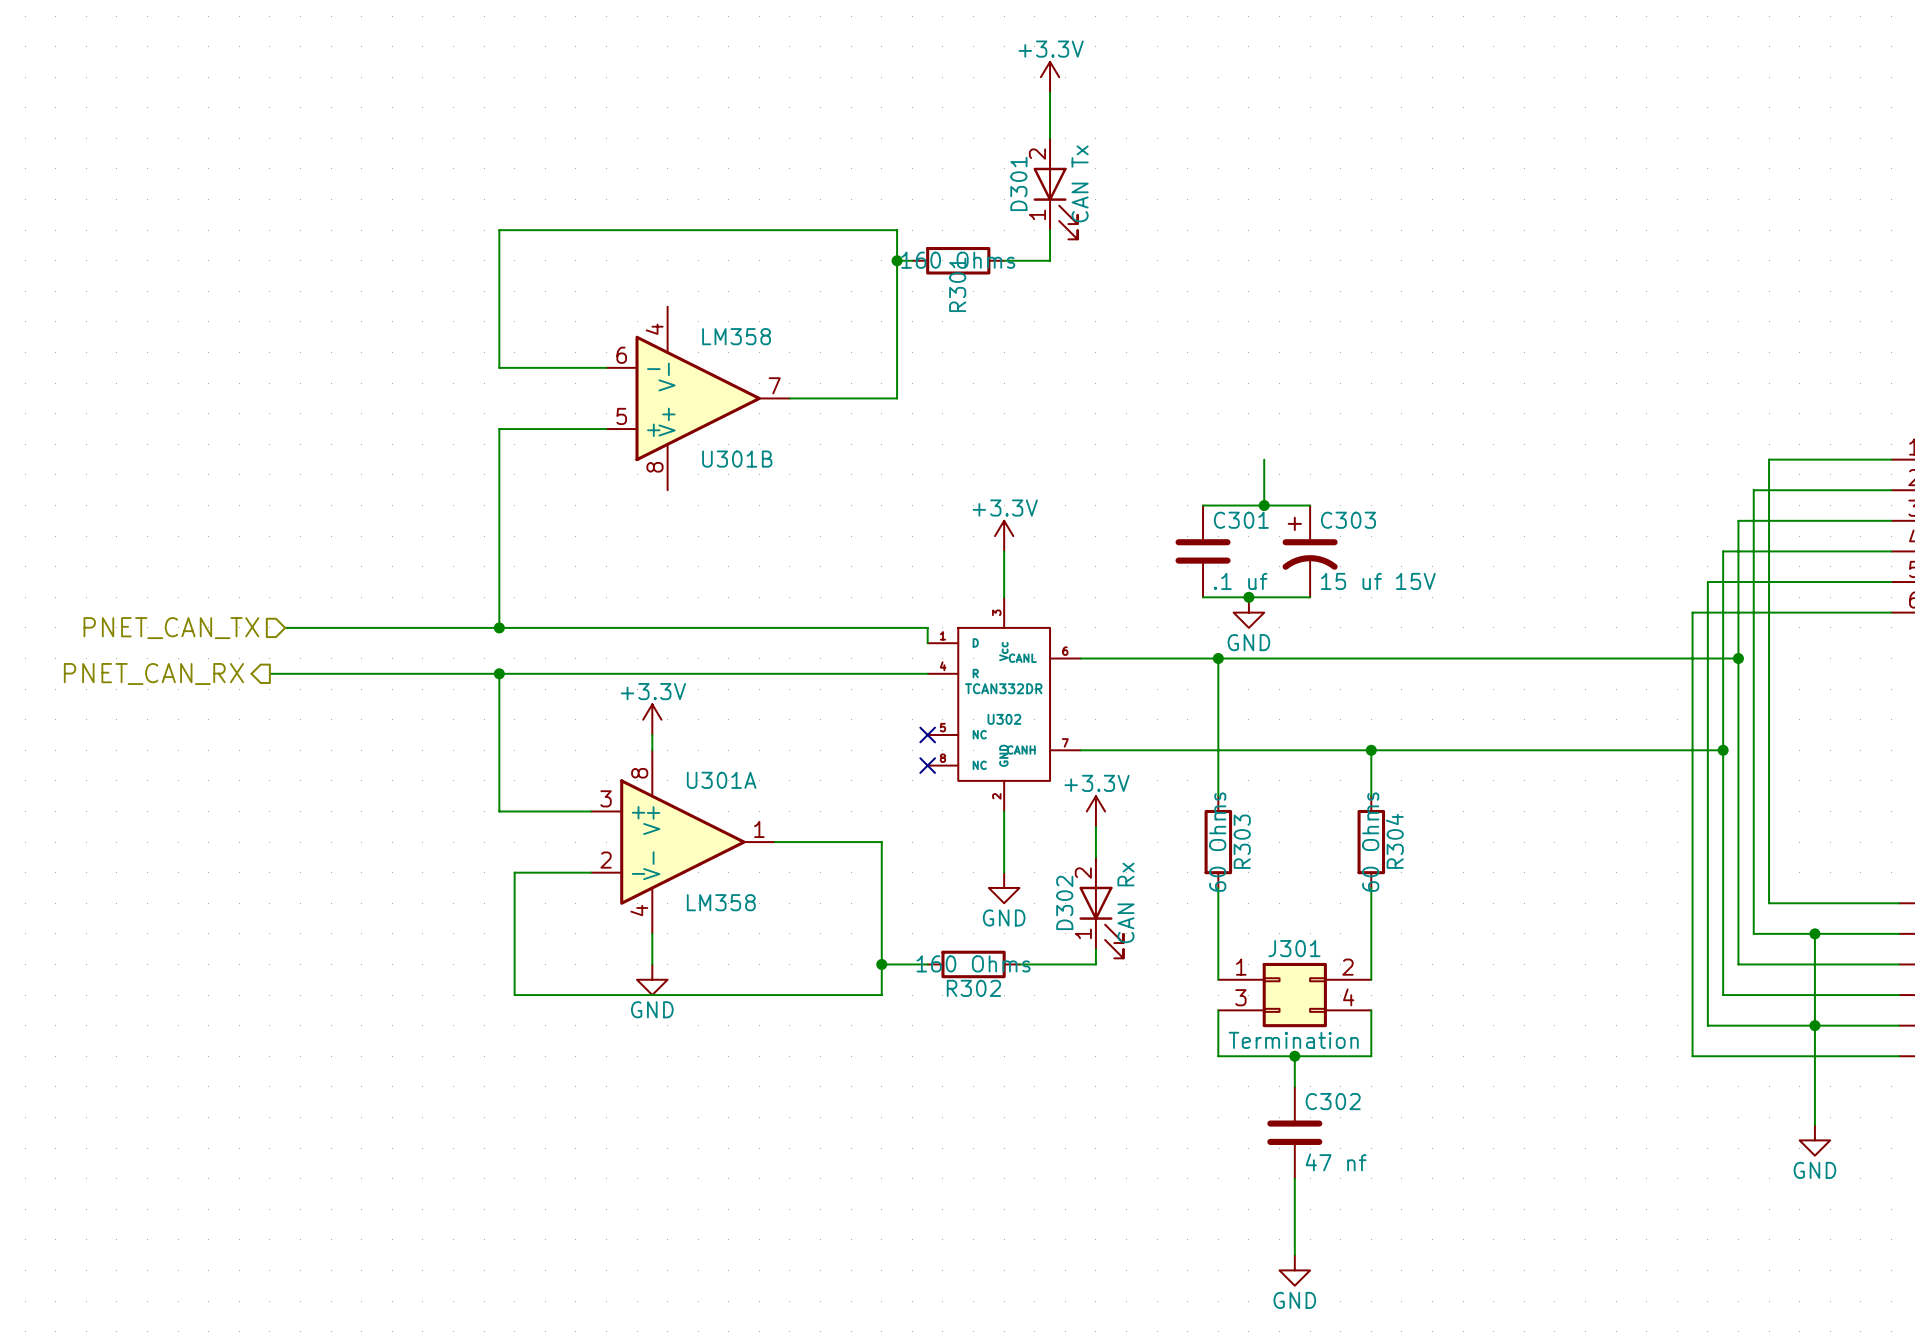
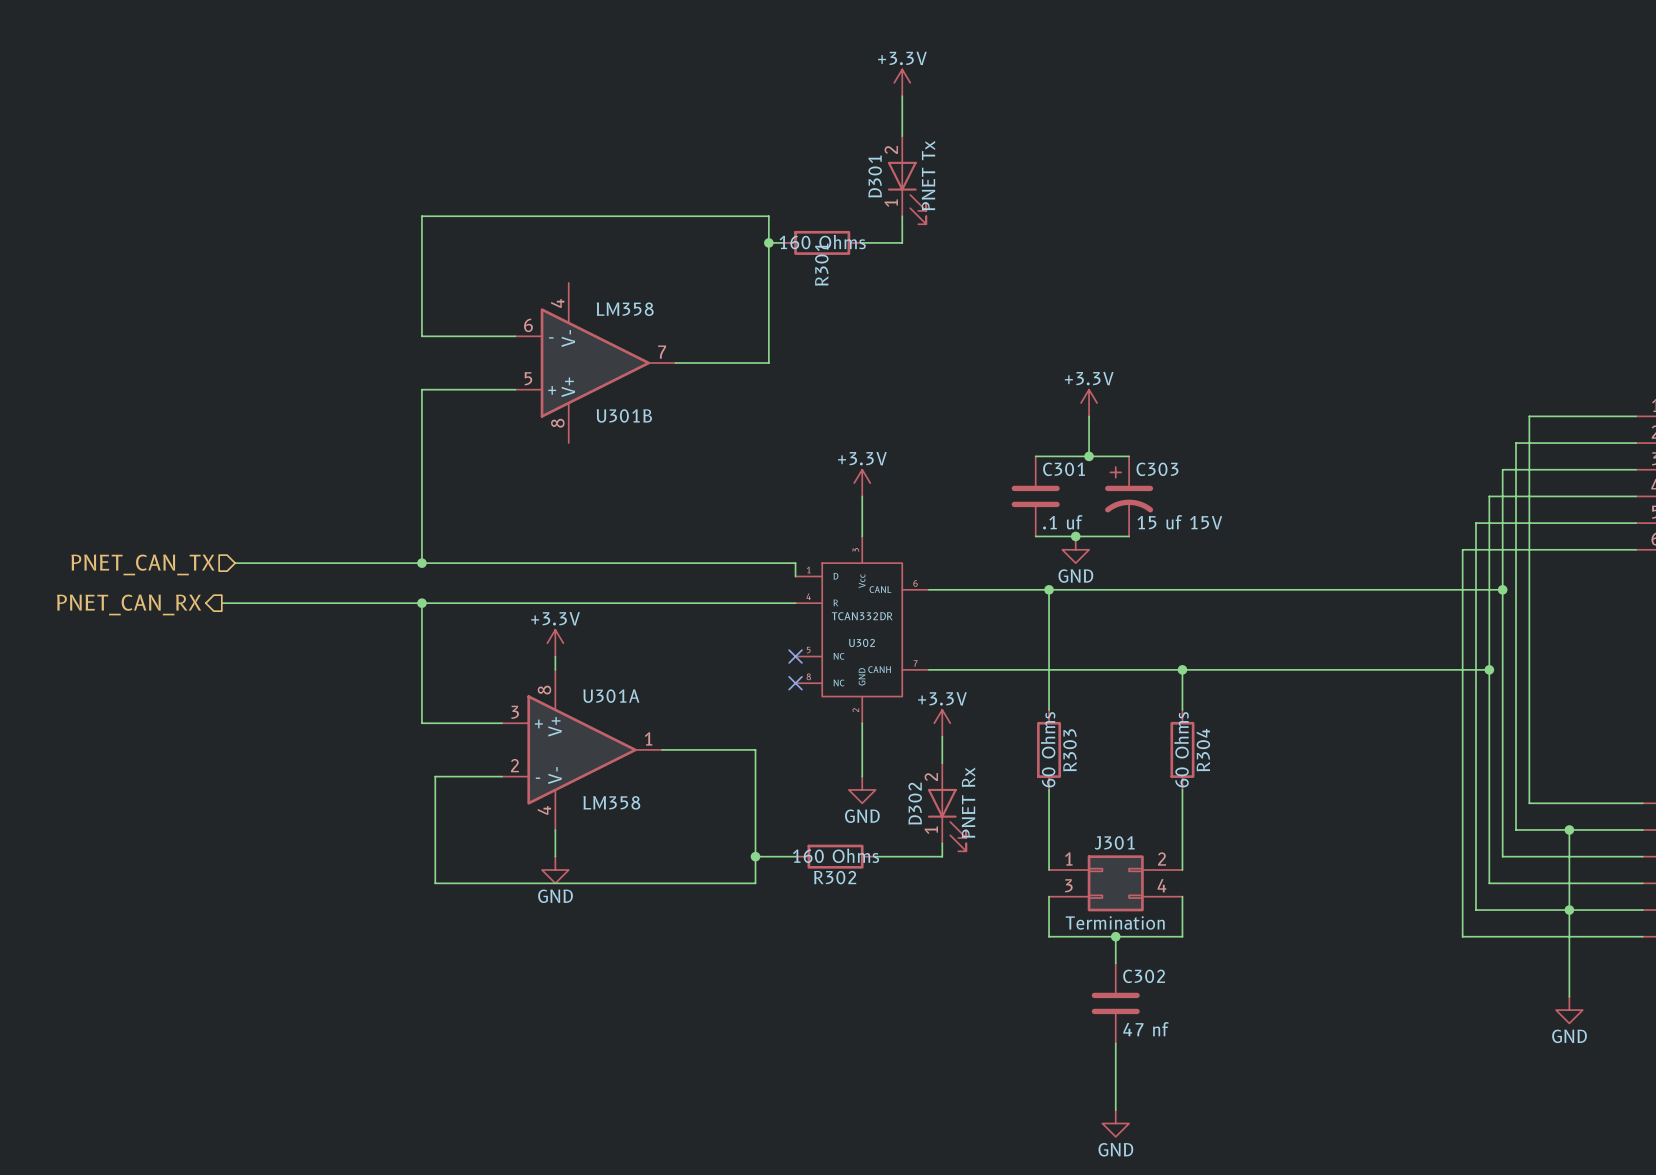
D301 value: CAN Tx (1080, 183) -> PNET Tx (928, 175)
power symbol: none -> +3.3V (1089, 403)
D302 value: CAN Rx (1125, 902) -> PNET Rx (968, 802)

